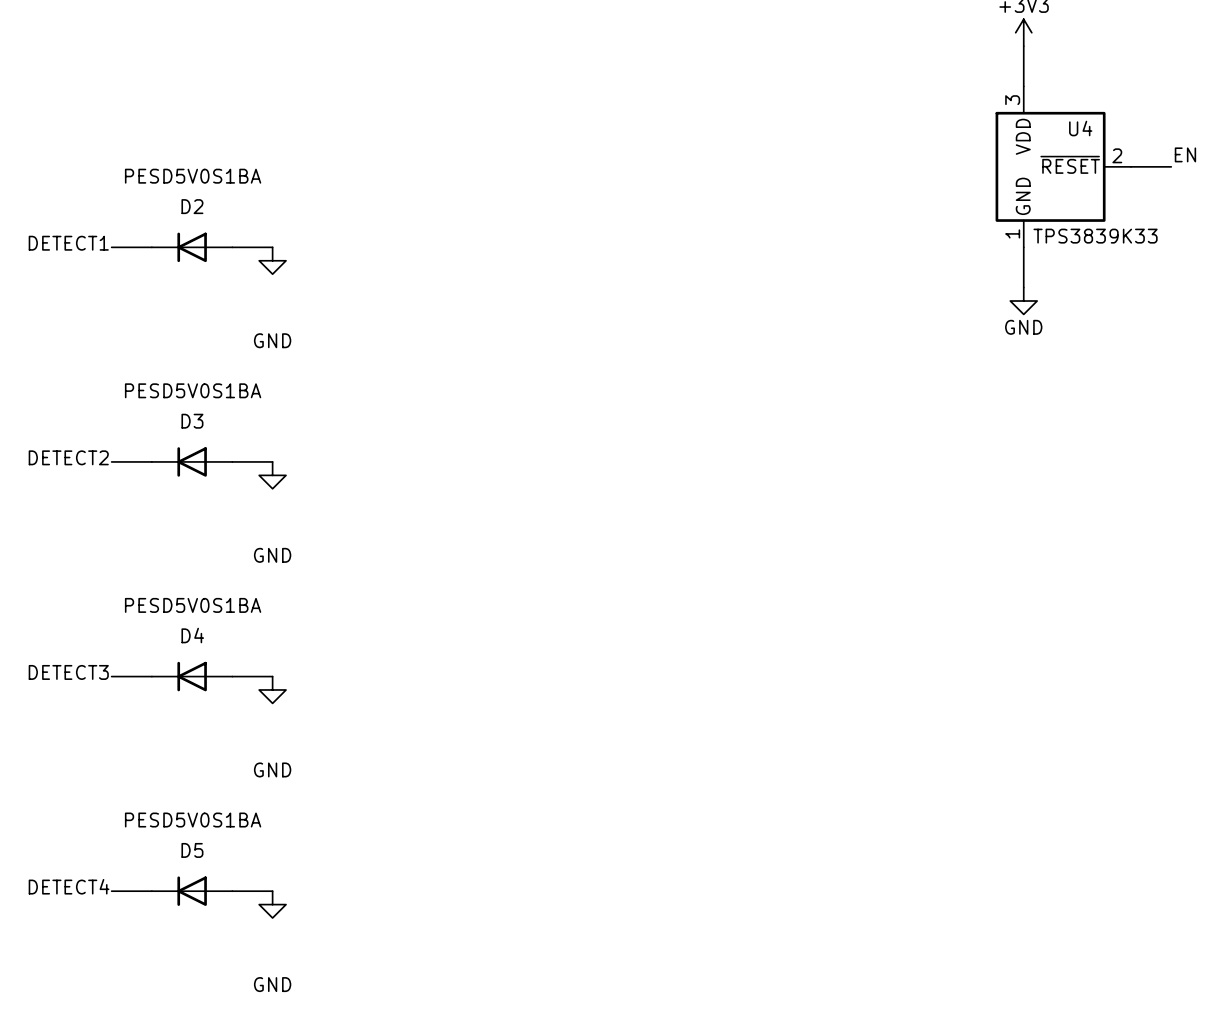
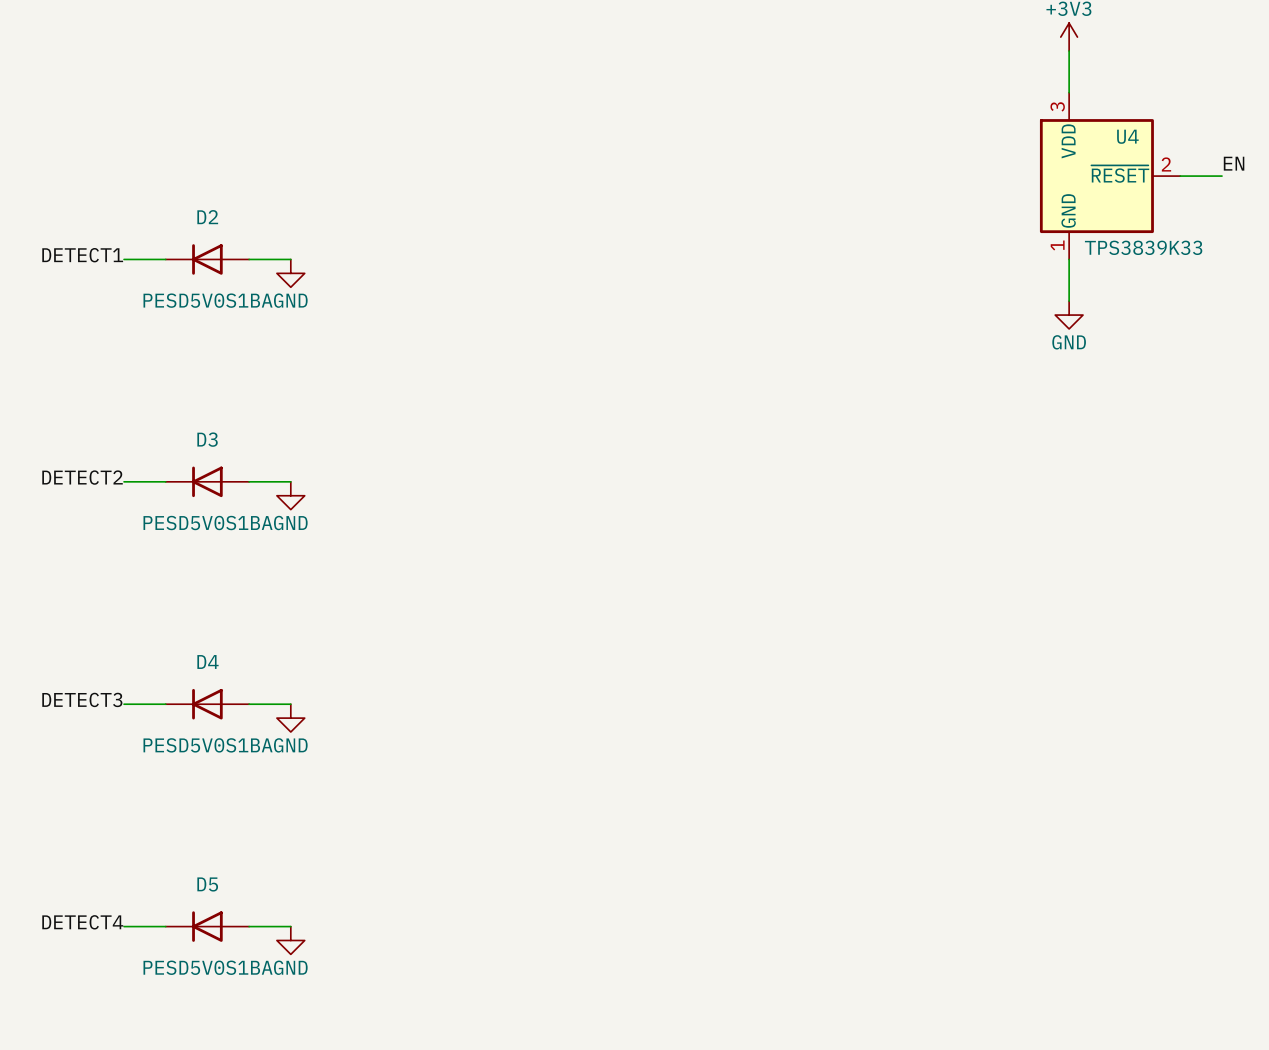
D2 value position: PESD5V0S1BA (193, 176) -> PESD5V0S1BA (208, 300)
power symbol text position: GND (272, 340) -> GND (290, 300)
D3 value position: PESD5V0S1BA (193, 390) -> PESD5V0S1BA (208, 523)
power symbol text position: GND (272, 555) -> GND (290, 523)
D4 value position: PESD5V0S1BA (193, 605) -> PESD5V0S1BA (208, 745)
power symbol text position: GND (272, 769) -> GND (290, 745)
D5 value position: PESD5V0S1BA (193, 820) -> PESD5V0S1BA (208, 967)
power symbol text position: GND (272, 984) -> GND (290, 967)

